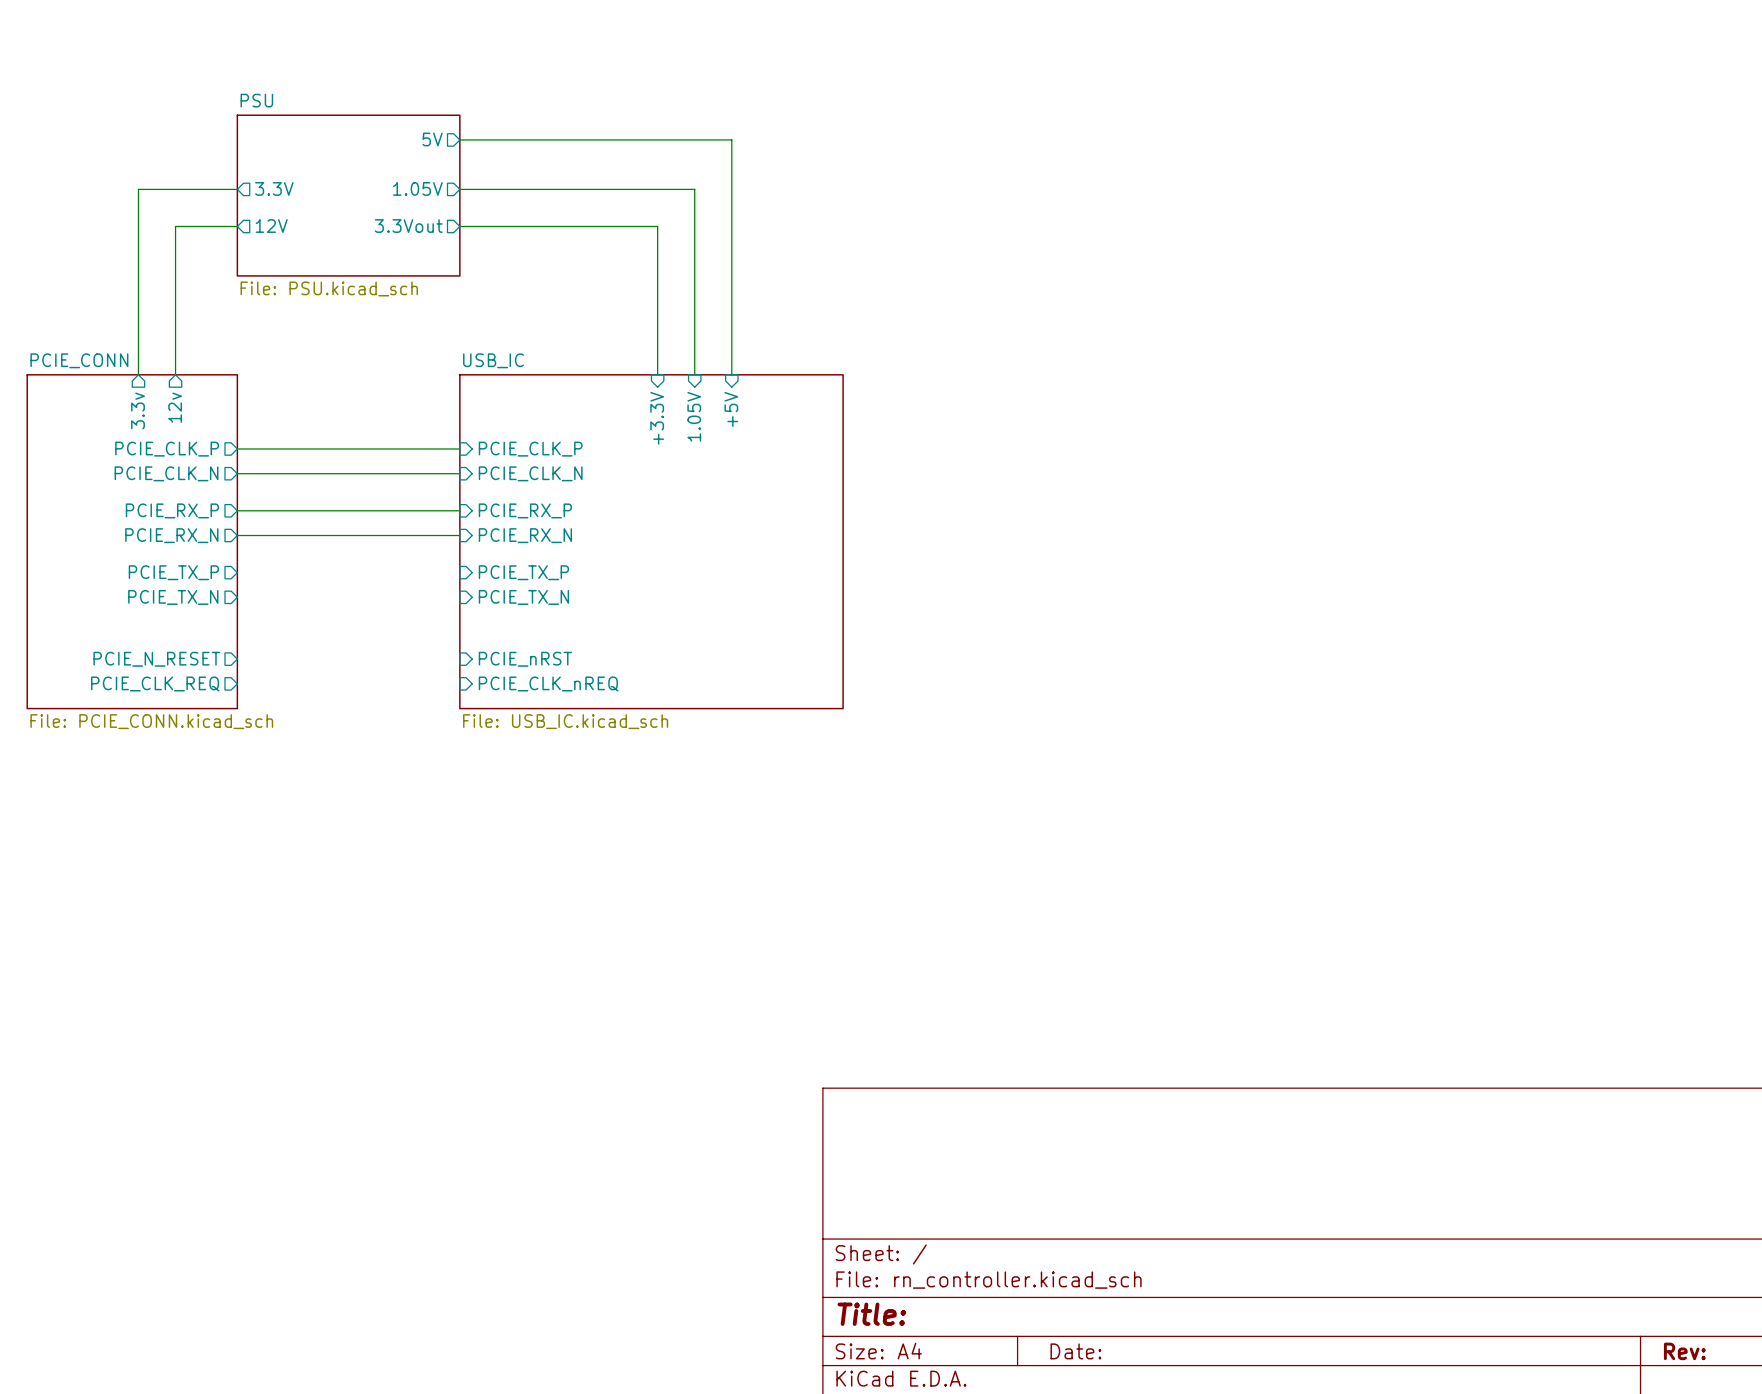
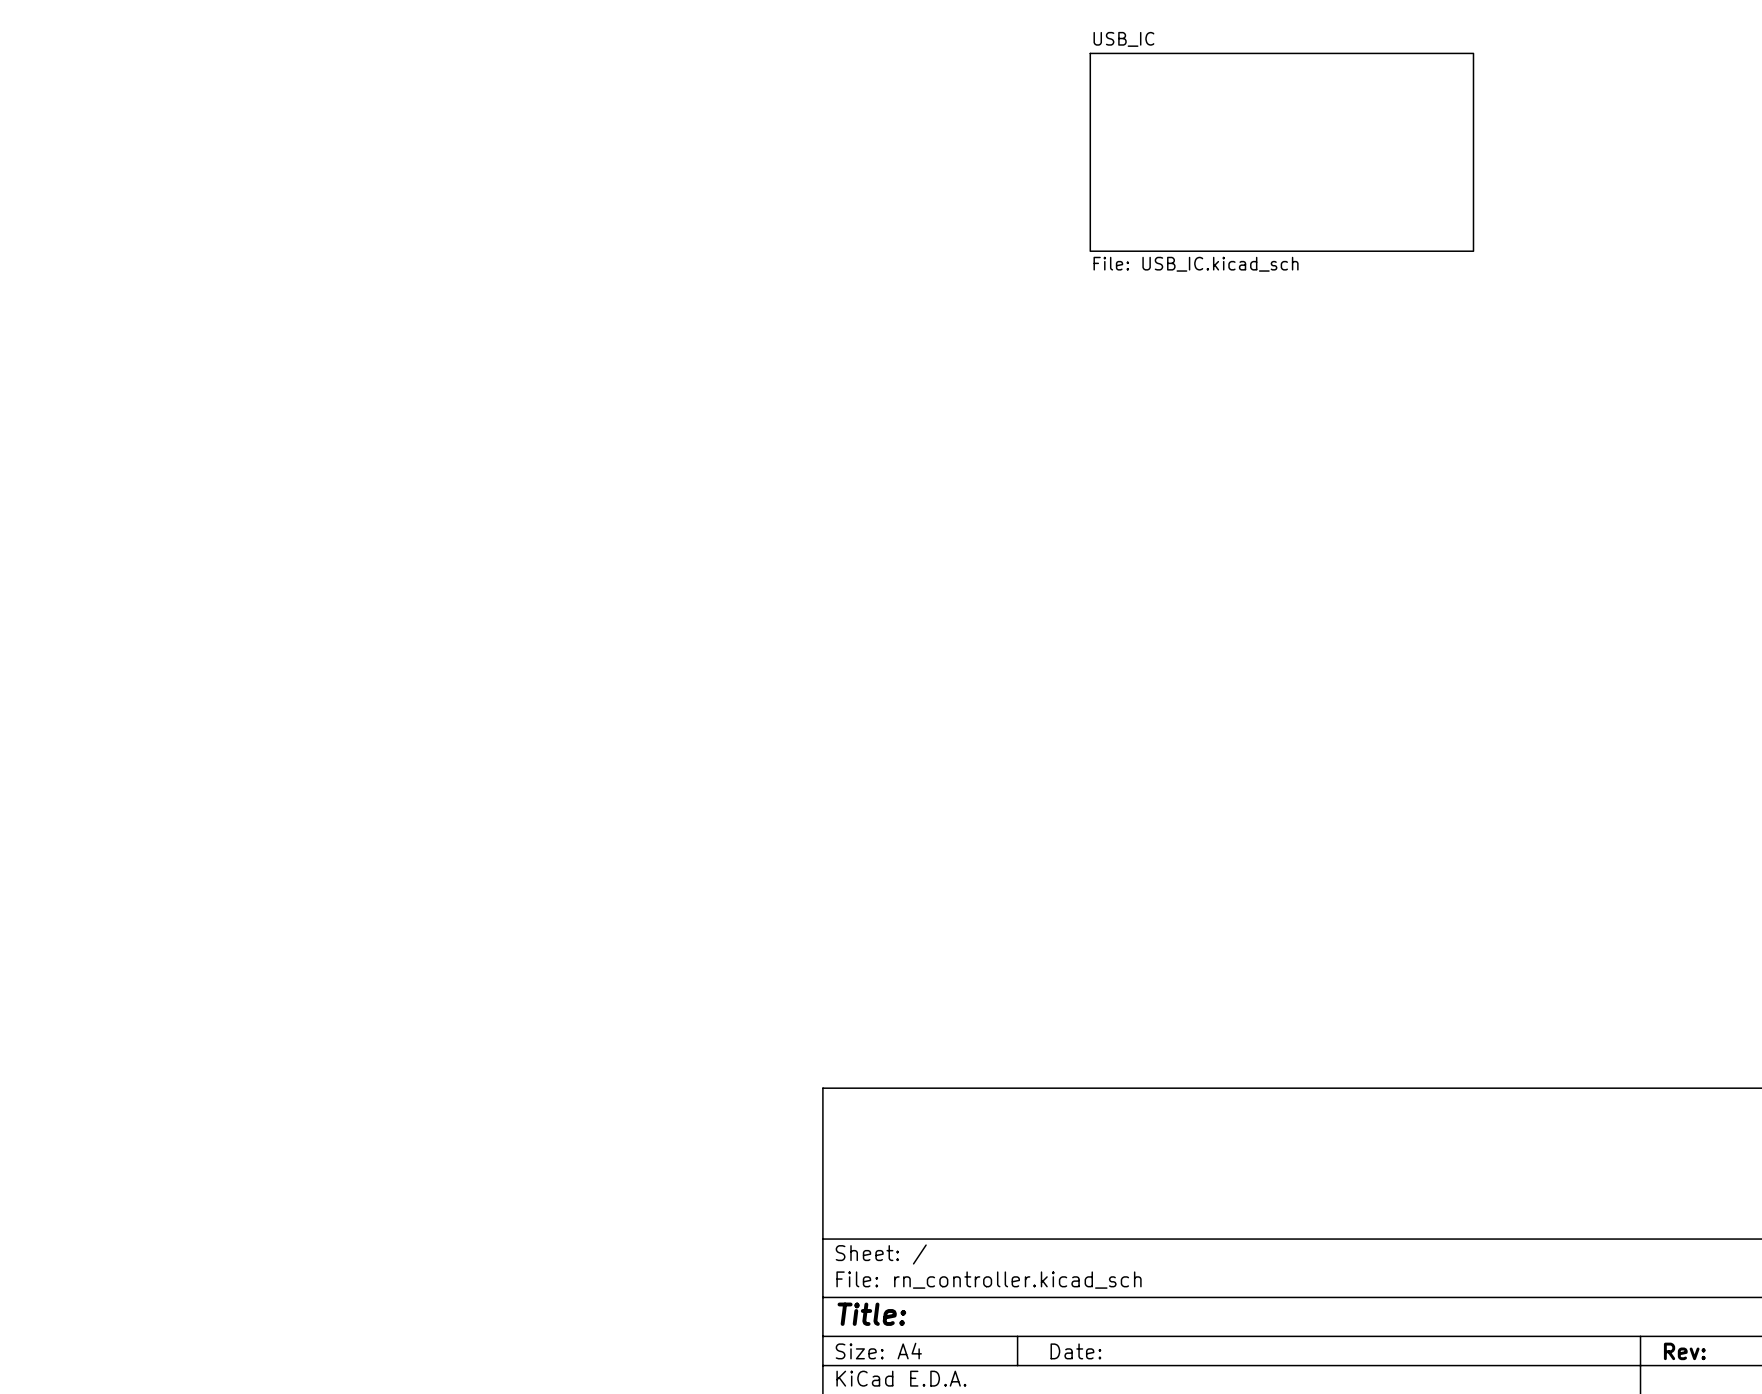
sheet pin: 5V (432, 139) -> none
wire: (459, 139) (731, 139) (731, 374) -> none
sheet USB_IC: none -> File: USB_IC.kicad_sch (1281, 152)
sheet pin: 3.3V (274, 188) -> none
sheet pin: 1.05V (417, 188) -> none
wire: (237, 189) (138, 189) (138, 374) -> none
wire: (459, 189) (694, 189) (694, 374) -> none
sheet PSU: File: PSU.kicad_sch (348, 195) -> none
wire: (237, 226) (175, 226) (175, 374) -> none
sheet pin: 12V (271, 226) -> none
sheet pin: 3.3Vout (408, 226) -> none
wire: (459, 226) (657, 226) (657, 374) -> none
sheet pin: 12v (175, 407) -> none
sheet pin: +5V (731, 409) -> none
sheet pin: 3.3v (138, 410) -> none
sheet pin: 1.05V (694, 416) -> none
sheet pin: +3.3V (657, 418) -> none
wire: (237, 448) (459, 448) -> none
sheet pin: PCIE_CLK_P (167, 449) -> none
sheet pin: PCIE_CLK_P (530, 449) -> none
sheet pin: PCIE_CLK_N (166, 473) -> none
wire: (237, 473) (459, 473) -> none
sheet pin: PCIE_CLK_N (530, 473) -> none
sheet pin: PCIE_RX_P (172, 510) -> none
wire: (237, 510) (459, 510) -> none
sheet pin: PCIE_RX_P (525, 510) -> none
sheet pin: PCIE_RX_N (171, 535) -> none
wire: (237, 535) (459, 535) -> none
sheet pin: PCIE_RX_N (525, 535) -> none
sheet PCIE_CONN: File: PCIE_CONN.kicad_sch (132, 541) -> none
sheet USB_IC: File: USB_IC.kicad_sch (651, 541) -> none
sheet pin: PCIE_TX_P (173, 572) -> none
sheet pin: PCIE_TX_P (523, 572) -> none
sheet pin: PCIE_TX_N (173, 597) -> none
sheet pin: PCIE_TX_N (523, 597) -> none
sheet pin: PCIE_N_RESET (156, 659) -> none
sheet pin: PCIE_nRST (525, 659) -> none
sheet pin: PCIE_CLK_REQ (155, 683) -> none
sheet pin: PCIE_CLK_nREQ (548, 683) -> none

